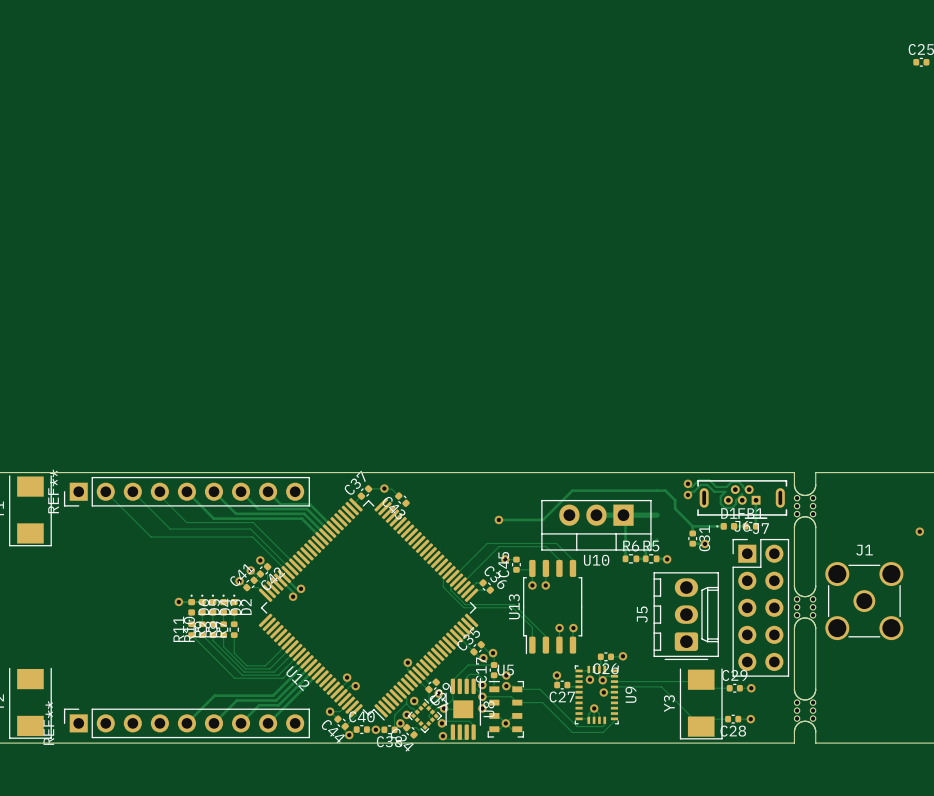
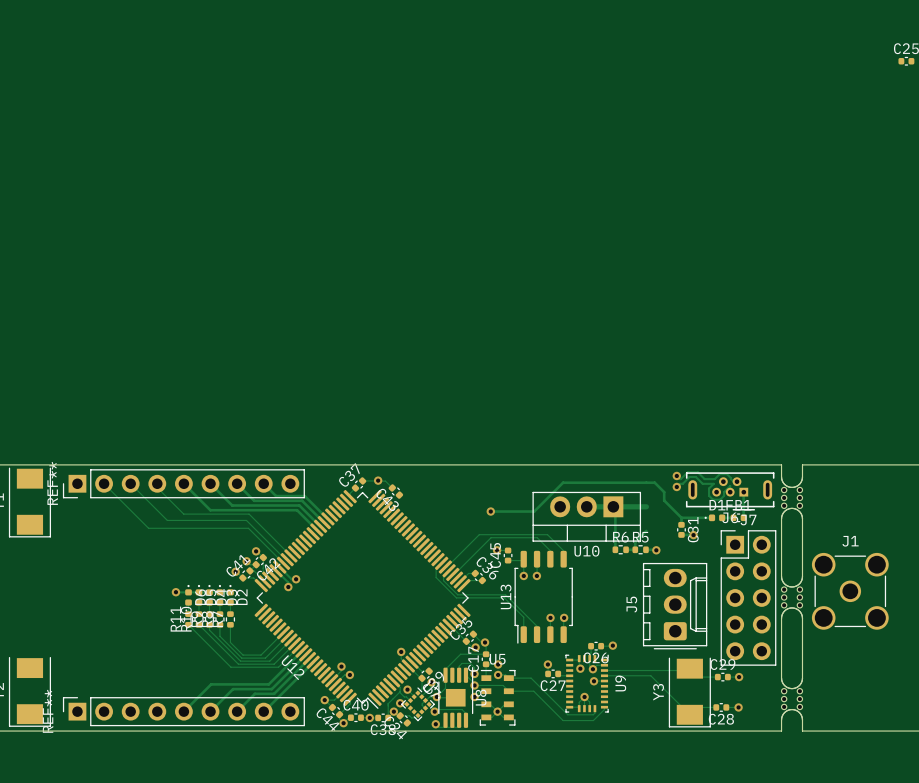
via: (919, 531) -> none

